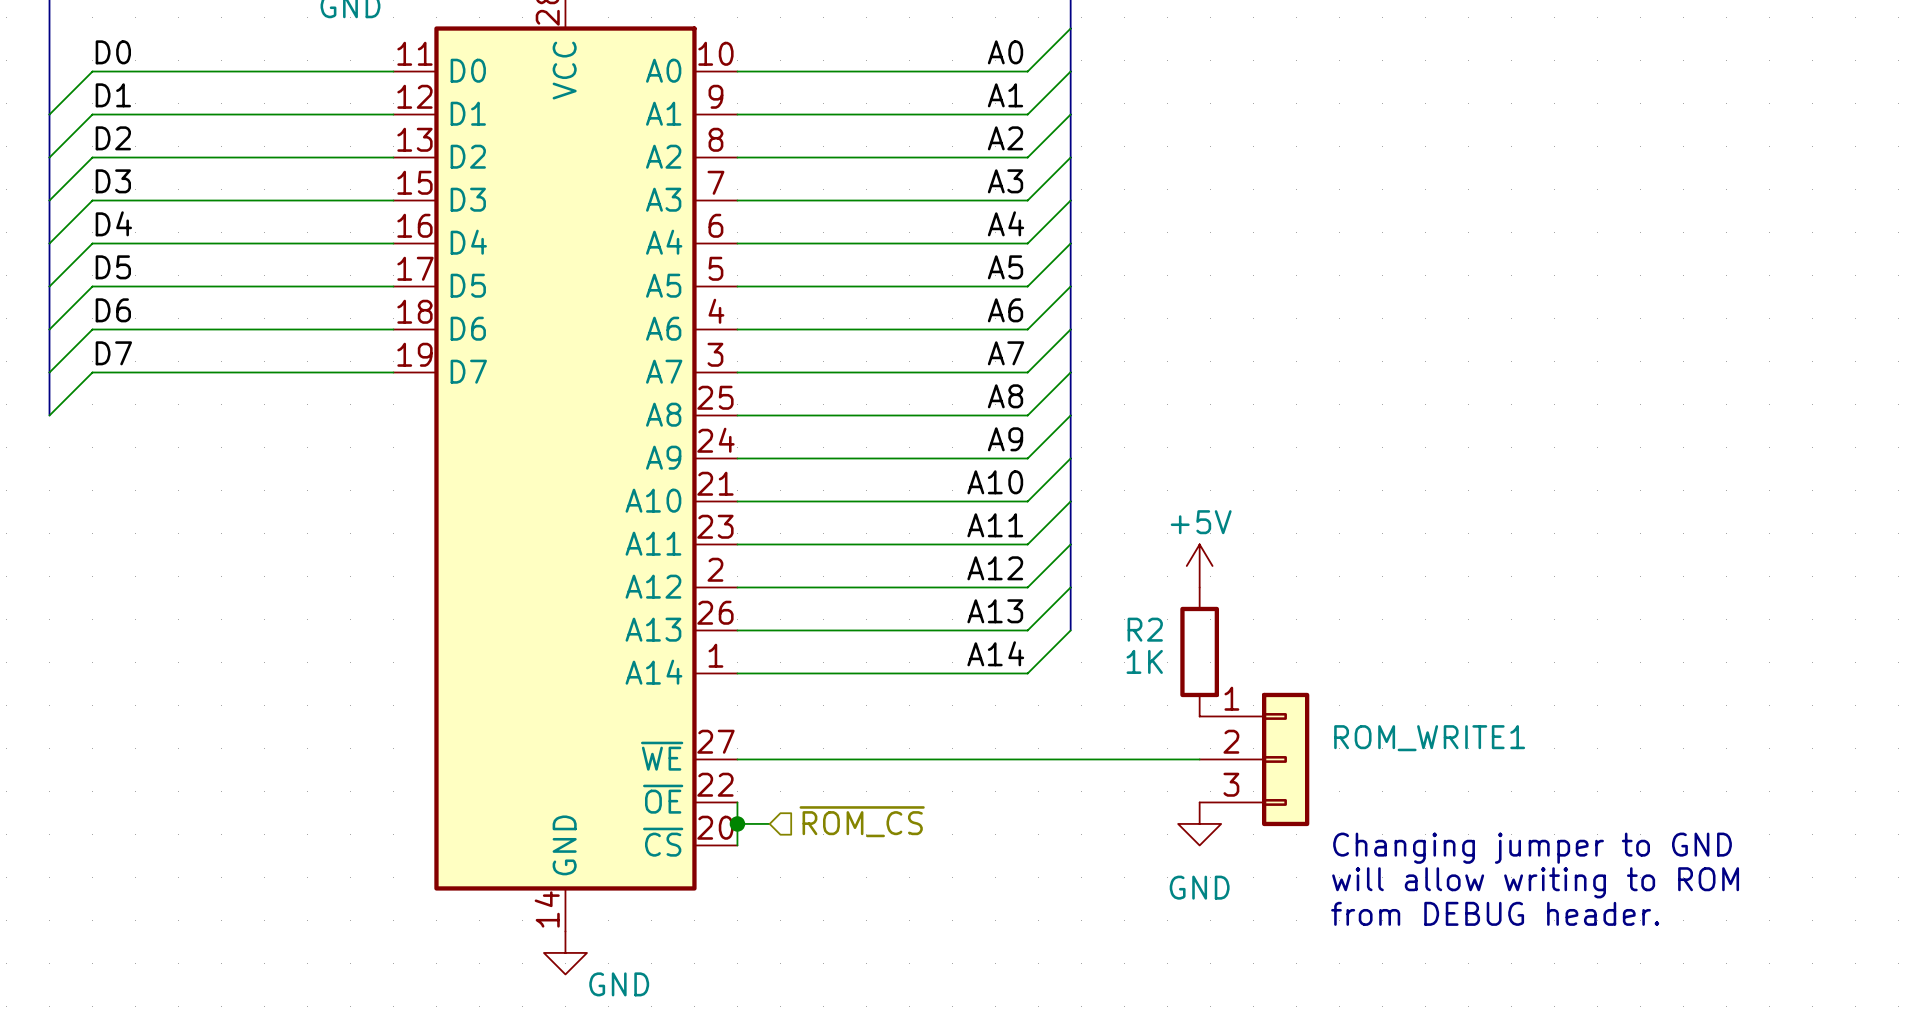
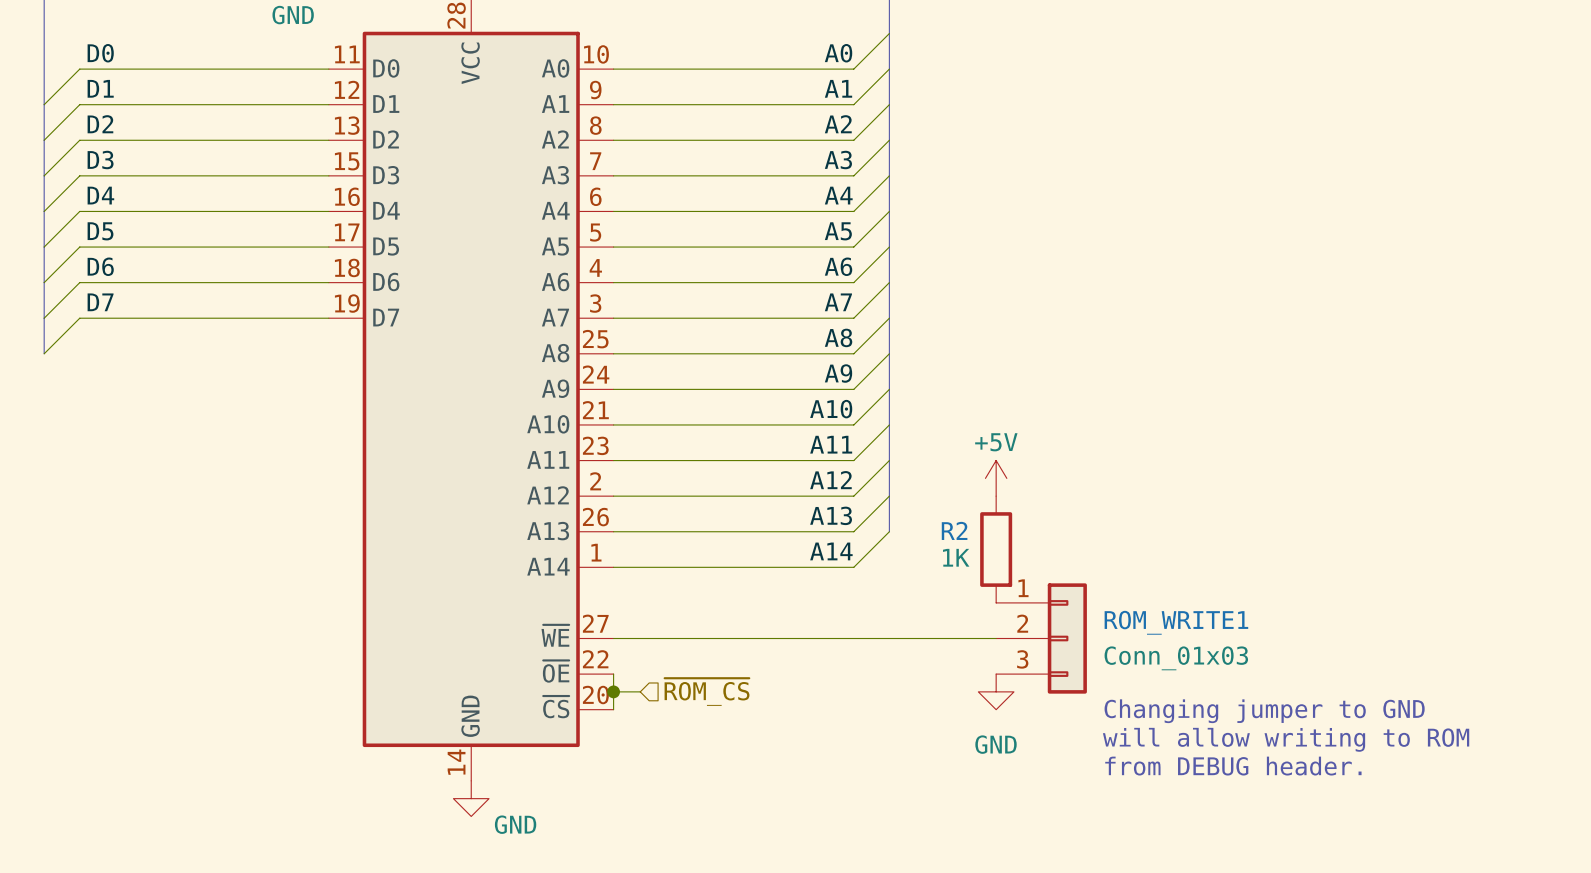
ROM_WRITE1 value: none -> Conn_01x03 (1176, 658)

